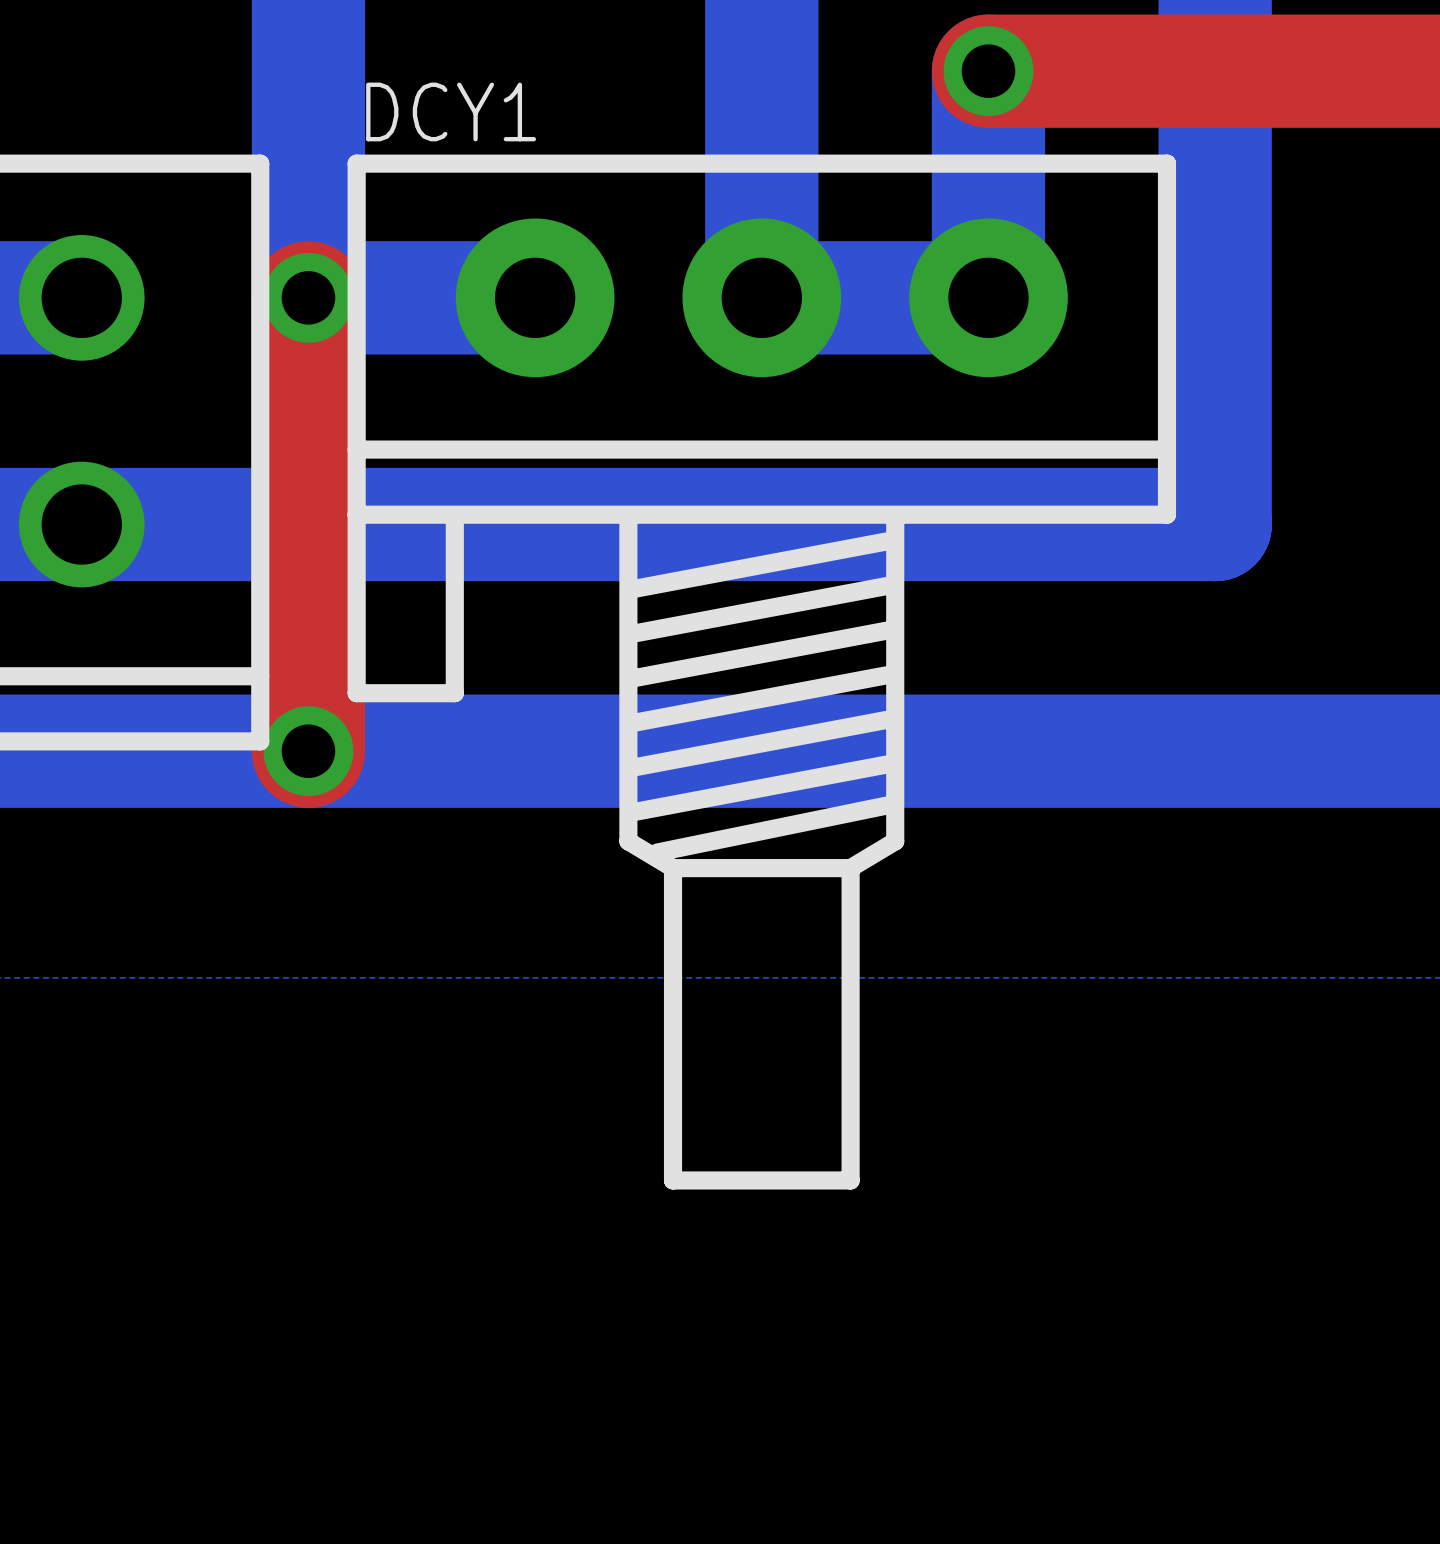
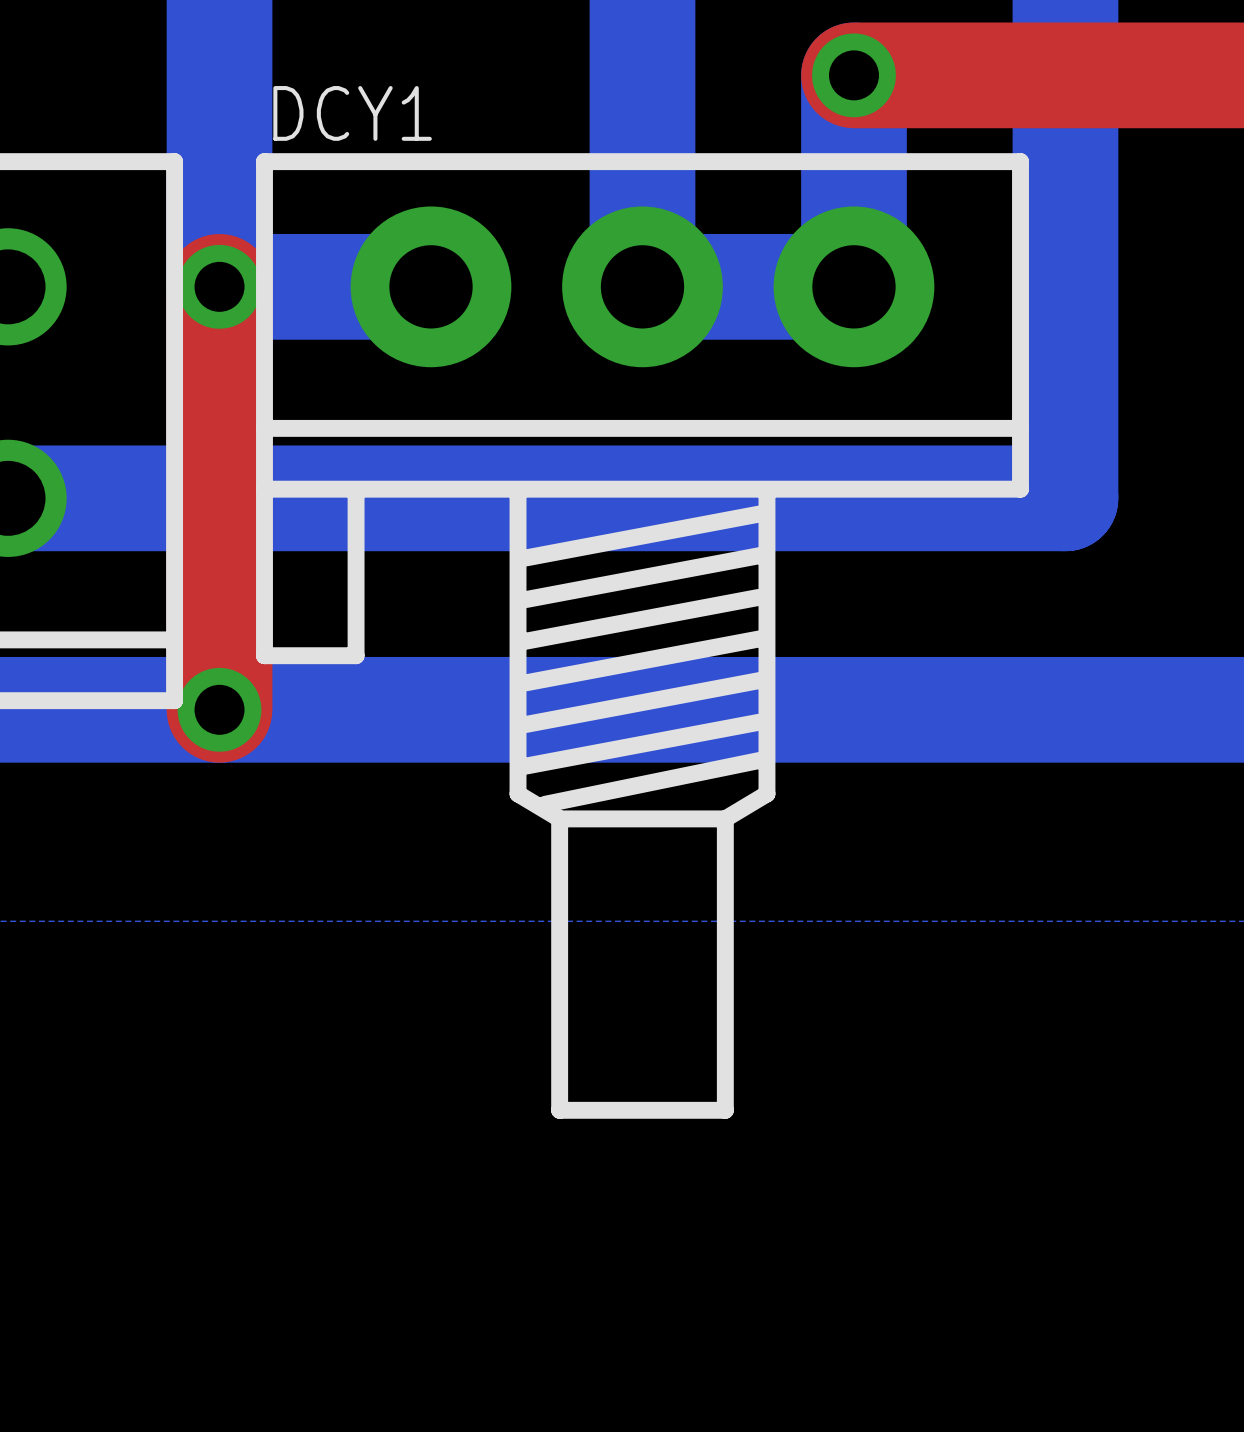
DCY1 footprint: [347, 154, 1177, 1190] -> [256, 153, 1029, 1119]

